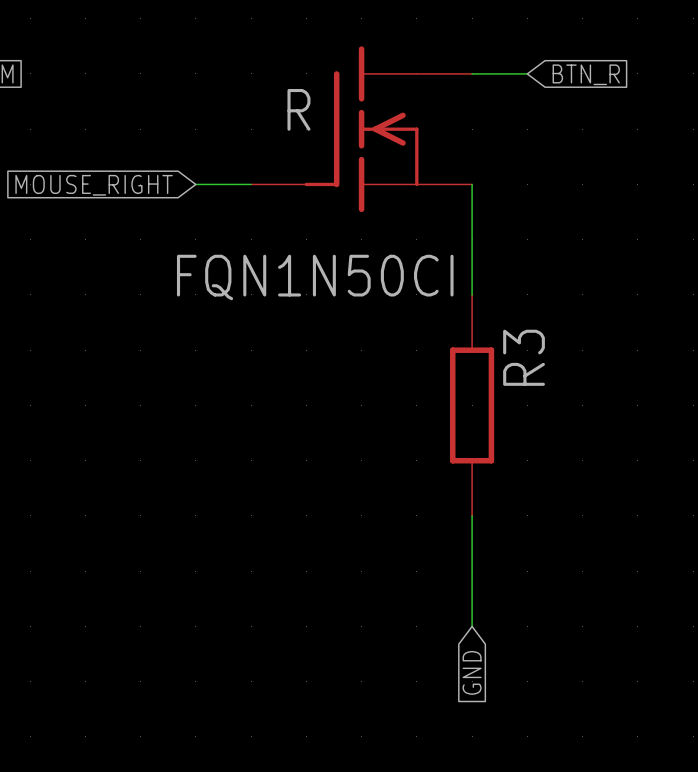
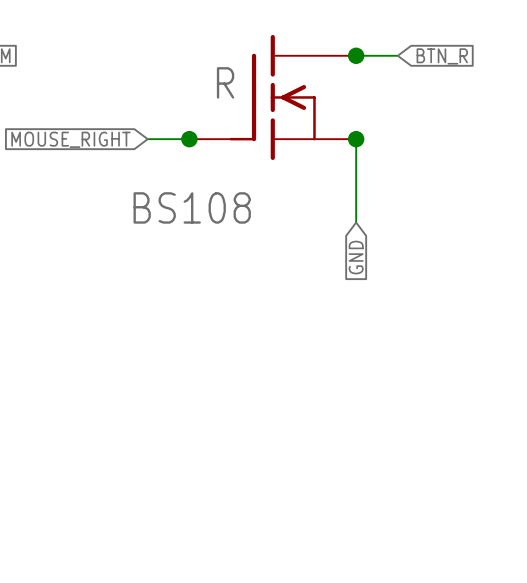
junction: none -> (356, 55)
junction: none -> (189, 139)
junction: none -> (356, 139)
R value: FQN1N50CI (315, 277) -> BS108 (192, 207)
R3: (472, 405) -> none
wire: (472, 515) (472, 626) -> none
global label position: GND (472, 672) -> GND (356, 257)

